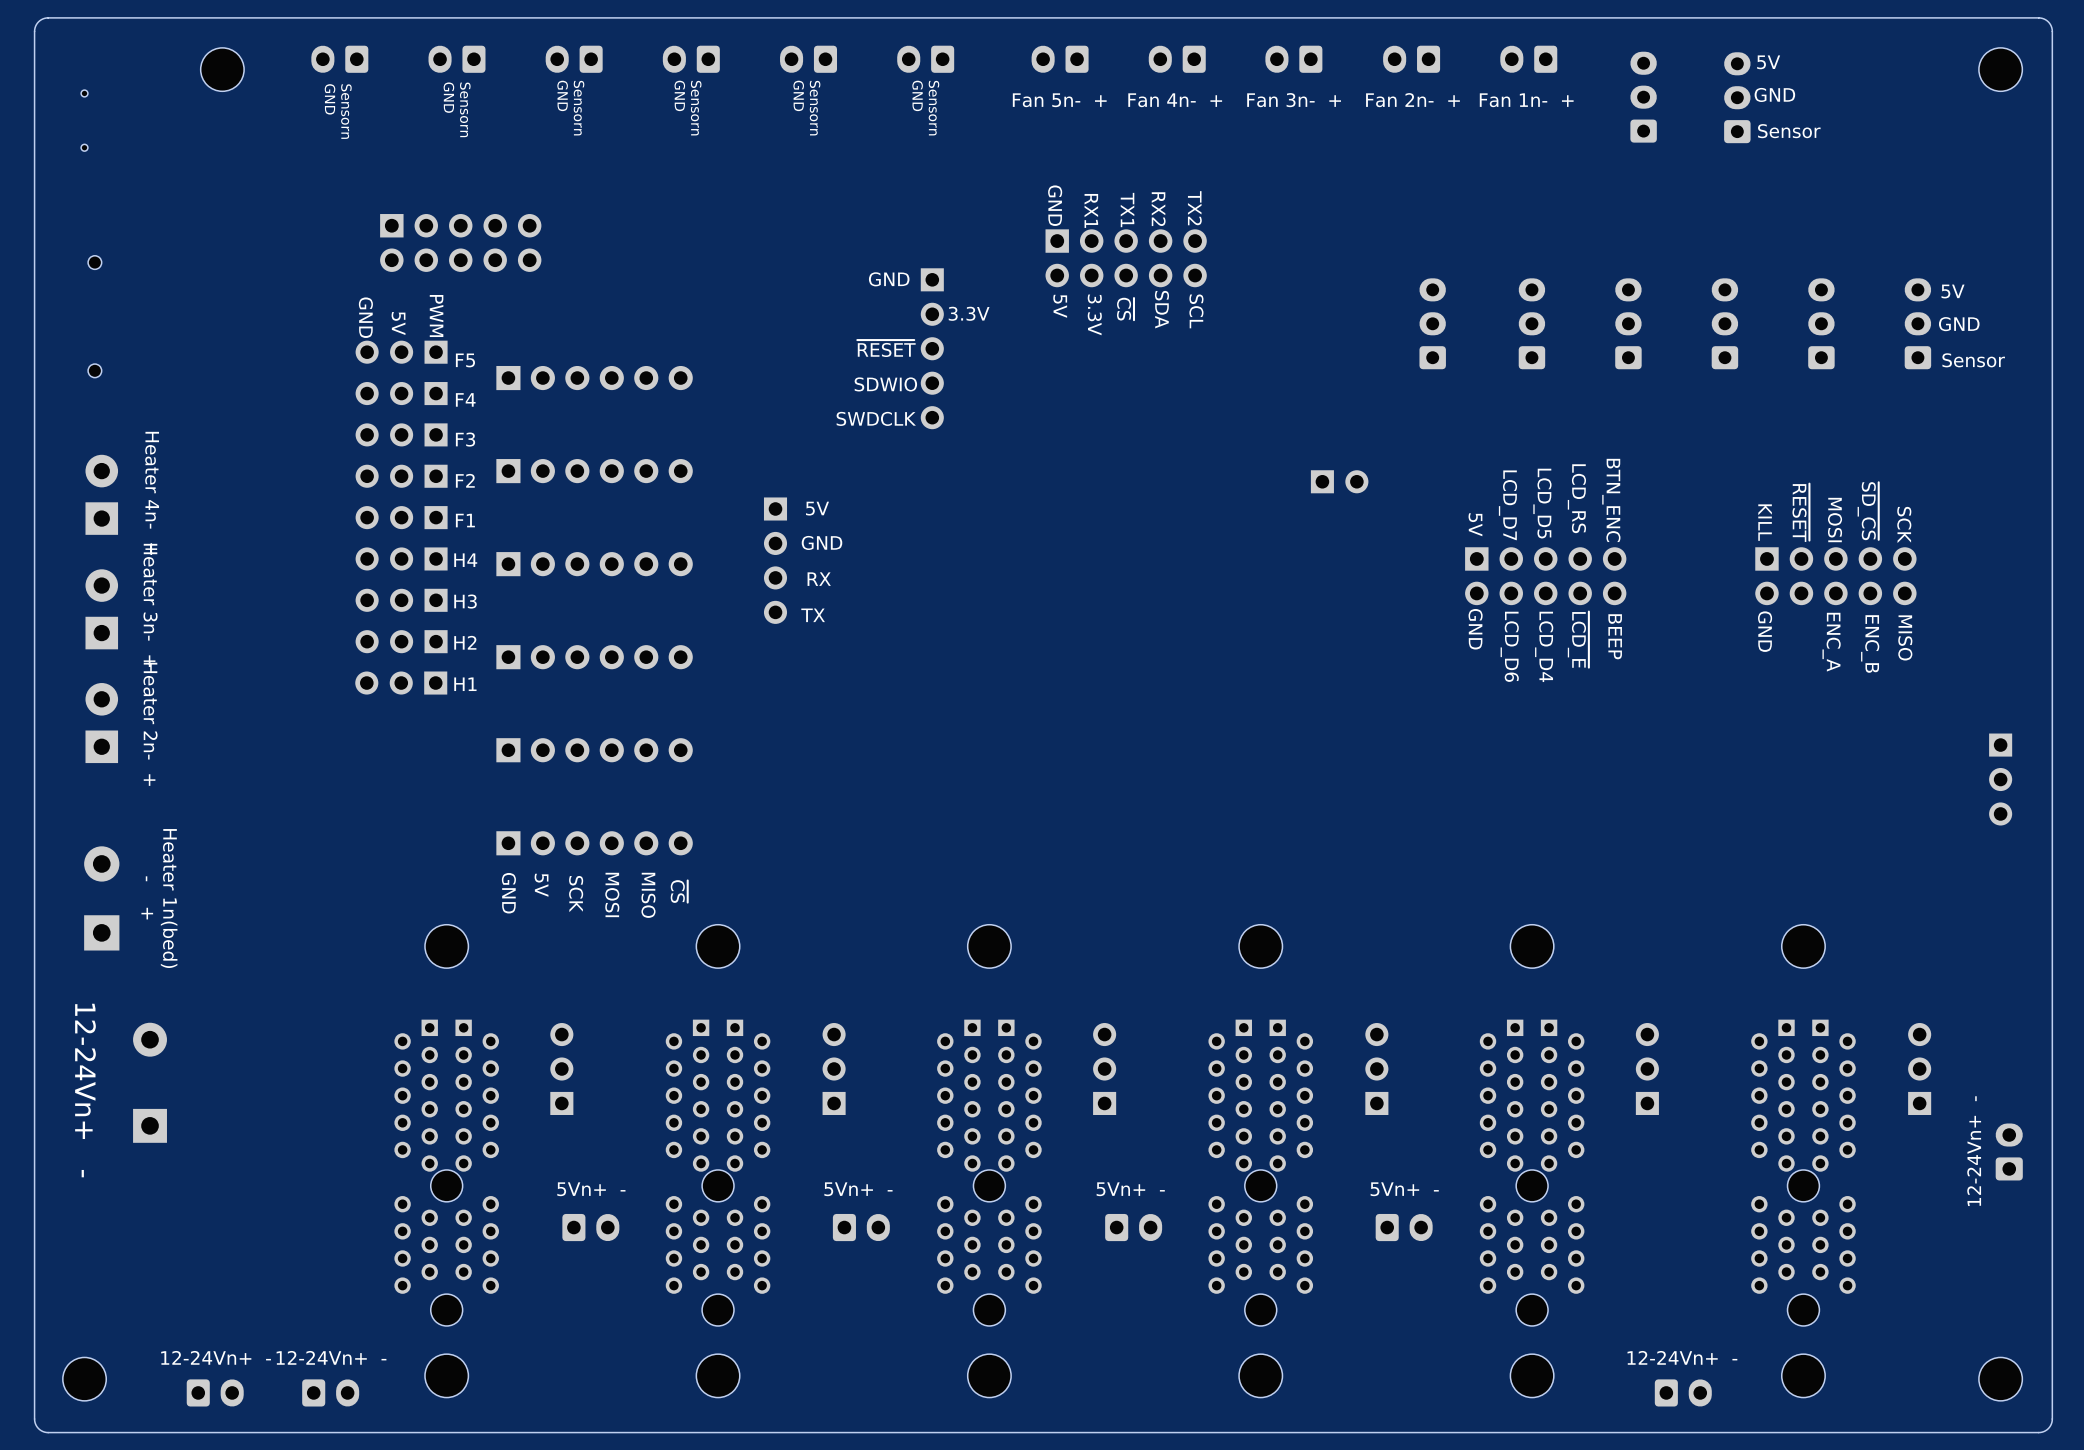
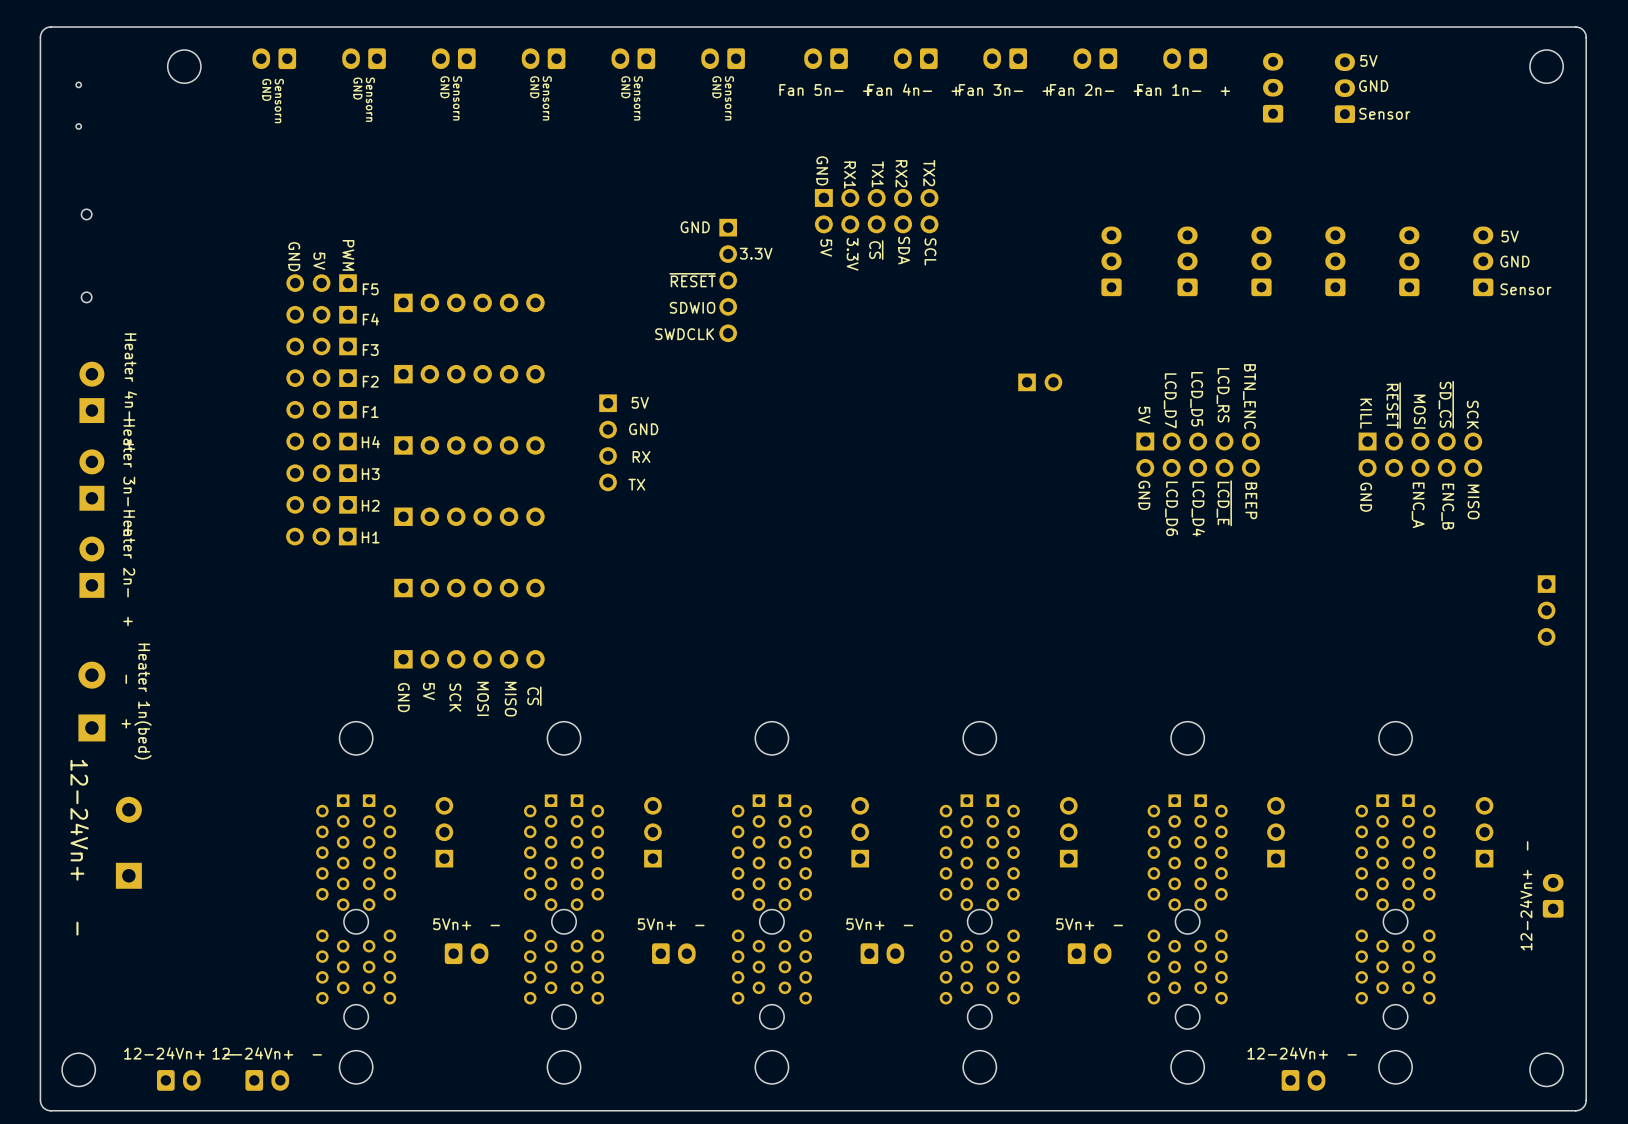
part: (460, 242) -> none

